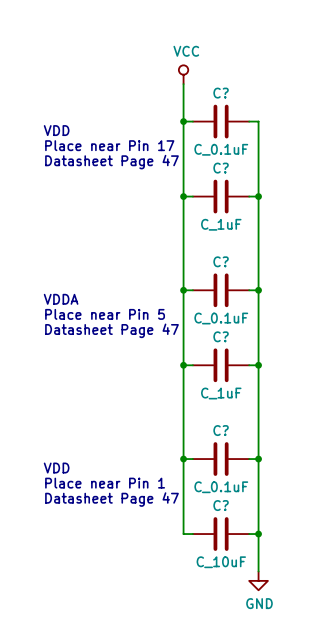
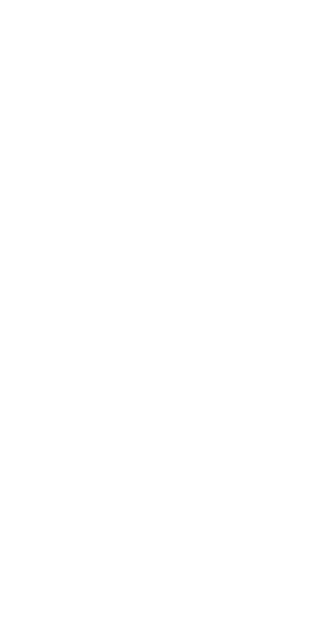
power symbol: VCC (183, 74) -> none
wire: (183, 84) (183, 534) (192, 534) -> none
wire: (183, 121) (192, 121) -> none
junction: (183, 121) -> none
C?: C_0.1uF (221, 121) -> none
wire: (249, 121) (258, 121) (258, 571) -> none
text: VDD (56, 130) -> none
text: Place near Pin 17 (109, 145) -> none
text: Datasheet Page 47 (111, 162) -> none
wire: (183, 196) (192, 196) -> none
junction: (183, 196) -> none
C?: C_1uF (221, 196) -> none
wire: (249, 196) (258, 196) -> none
junction: (258, 196) -> none
wire: (183, 290) (192, 290) -> none
junction: (183, 290) -> none
C?: C_0.1uF (221, 290) -> none
wire: (249, 290) (258, 290) -> none
junction: (258, 290) -> none
text: VDDA (61, 299) -> none
text: Place near Pin 5 (105, 314) -> none
text: Datasheet Page 47 (111, 330) -> none
wire: (183, 365) (192, 365) -> none
junction: (183, 365) -> none
C?: C_1uF (221, 365) -> none
wire: (249, 365) (258, 365) -> none
junction: (258, 365) -> none
wire: (183, 459) (192, 459) -> none
junction: (183, 459) -> none
C?: C_0.1uF (221, 459) -> none
wire: (249, 459) (258, 459) -> none
junction: (258, 459) -> none
text: VDD (56, 468) -> none
text: Place near Pin 1 (105, 483) -> none
text: Datasheet Page 47 (111, 499) -> none
C?: C_10uF (221, 534) -> none
wire: (249, 534) (258, 534) -> none
junction: (258, 534) -> none
power symbol: GND (258, 580) -> none

